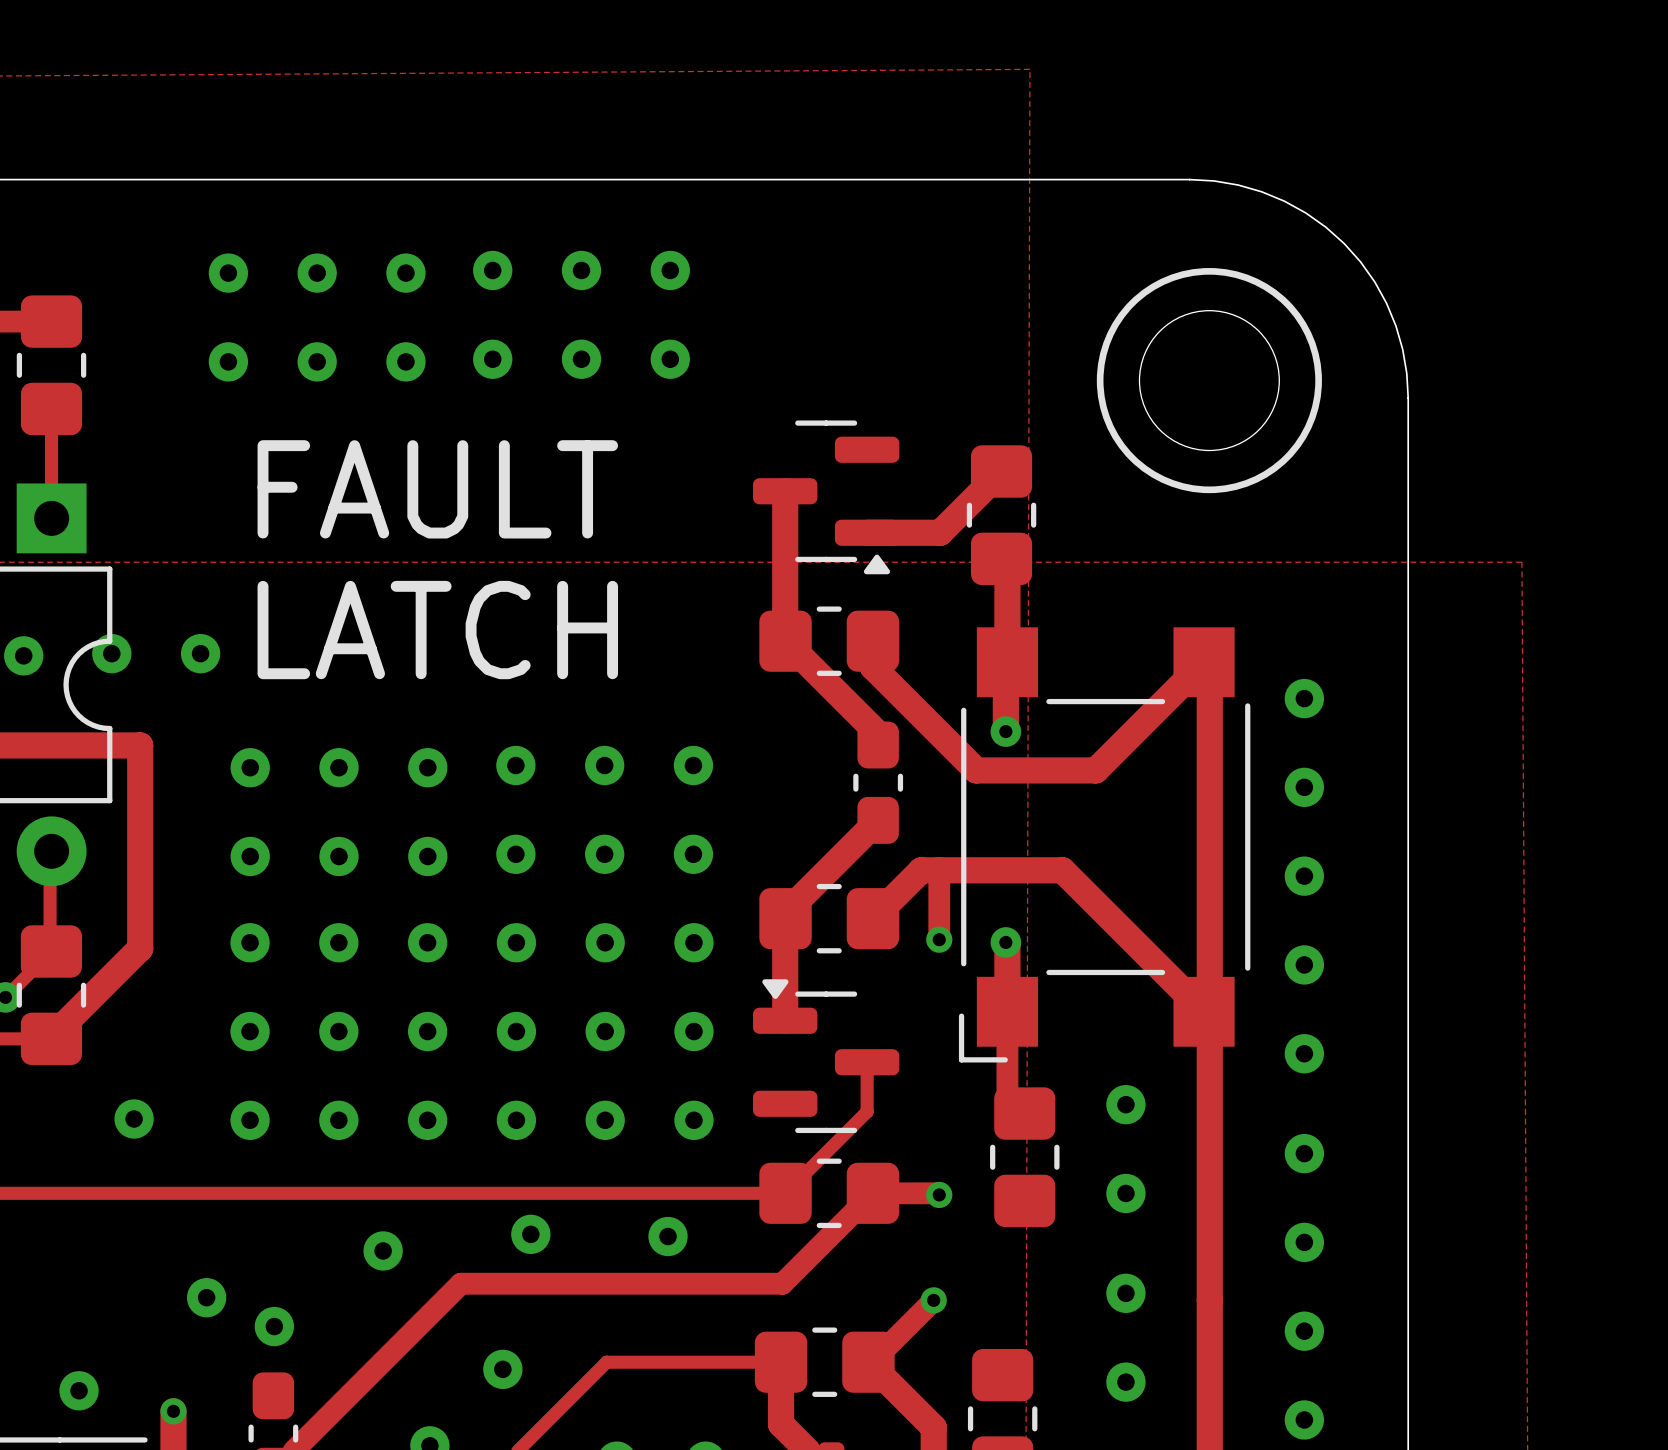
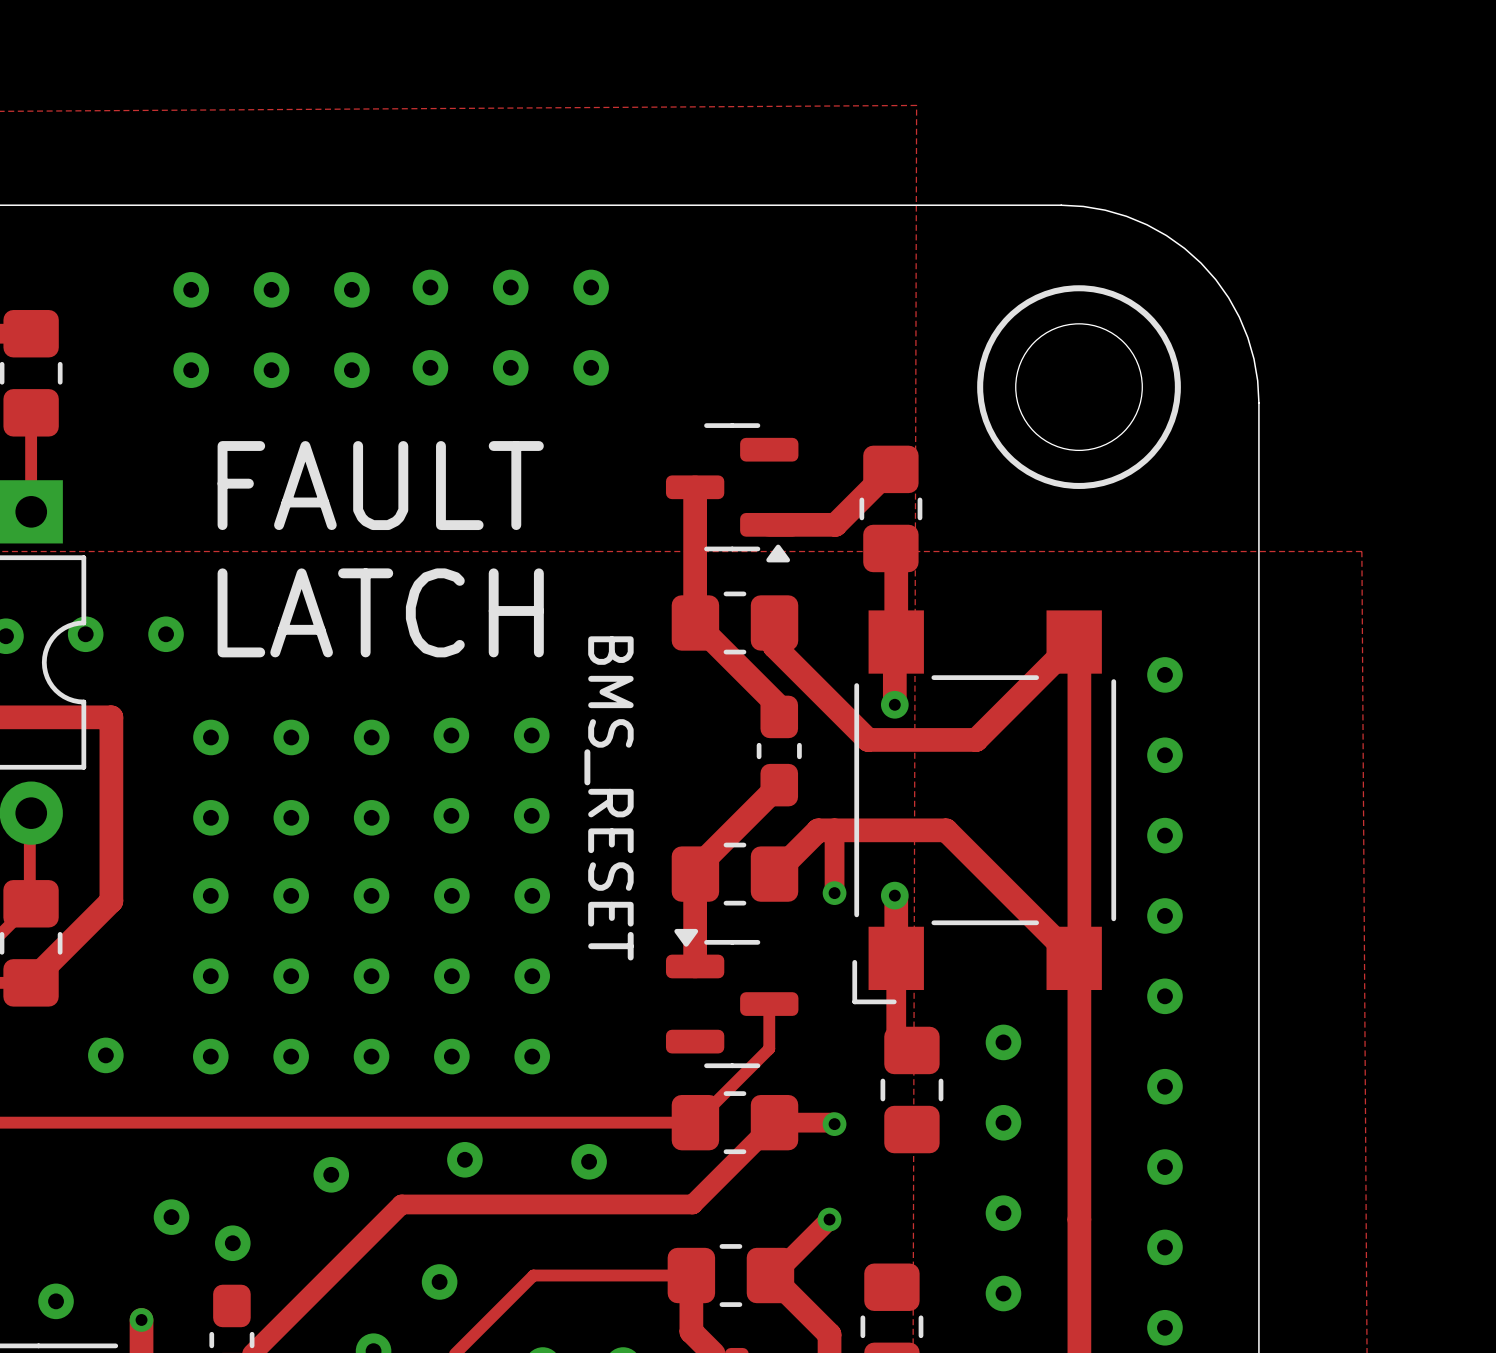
via: (693, 765) -> none
text: none -> BMS_RESET (609, 798)
via: (693, 854) -> none
via: (693, 942) -> none
via: (693, 1031) -> none
via: (693, 1120) -> none

